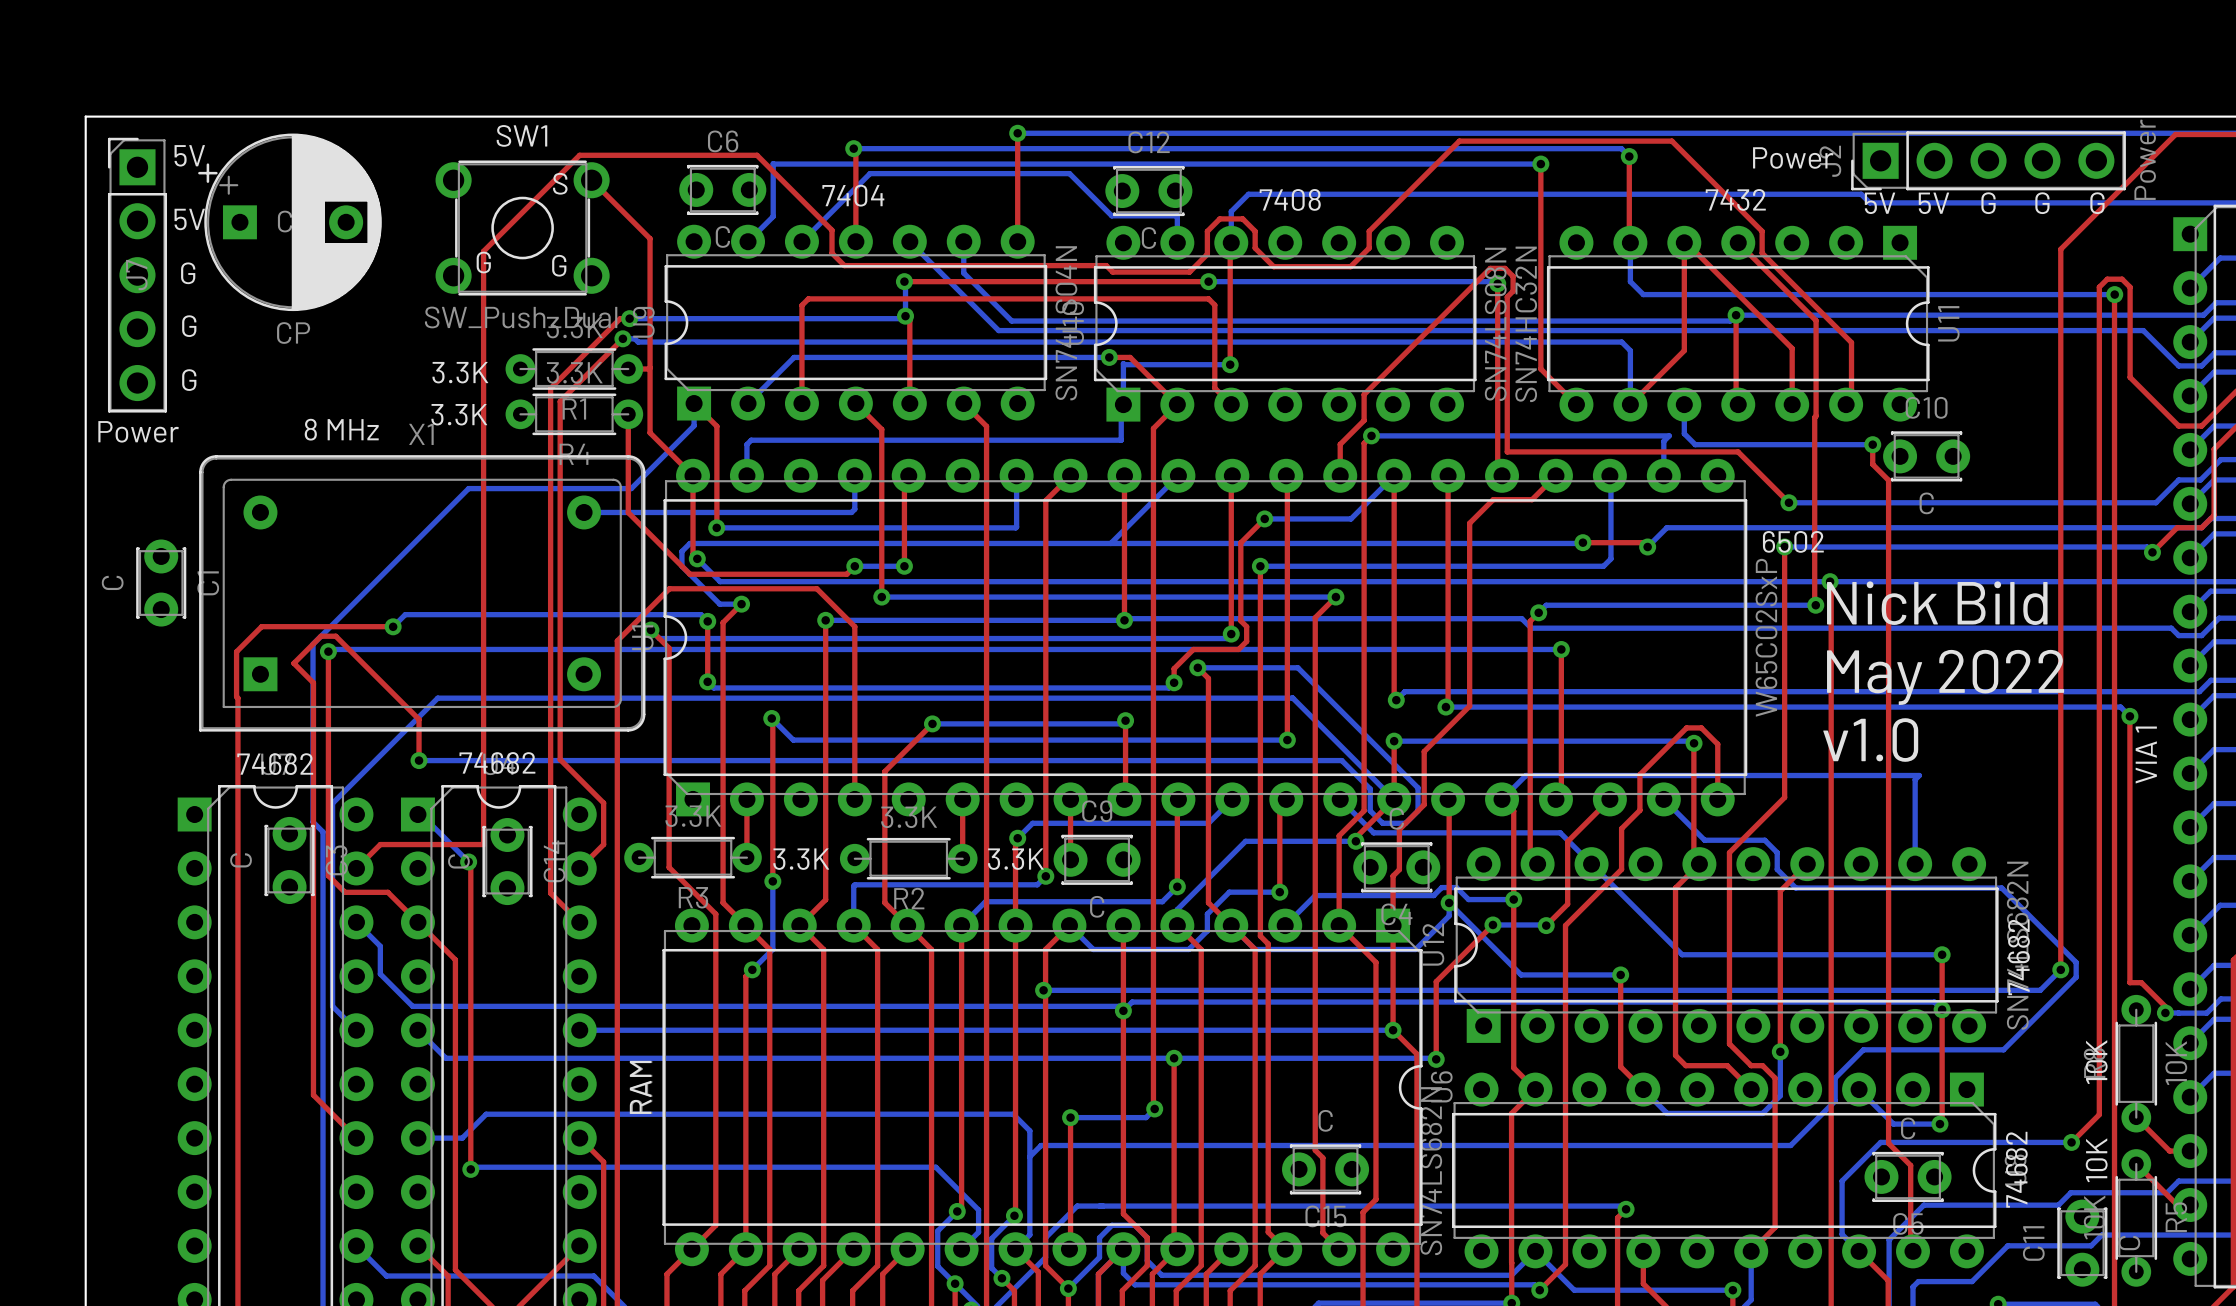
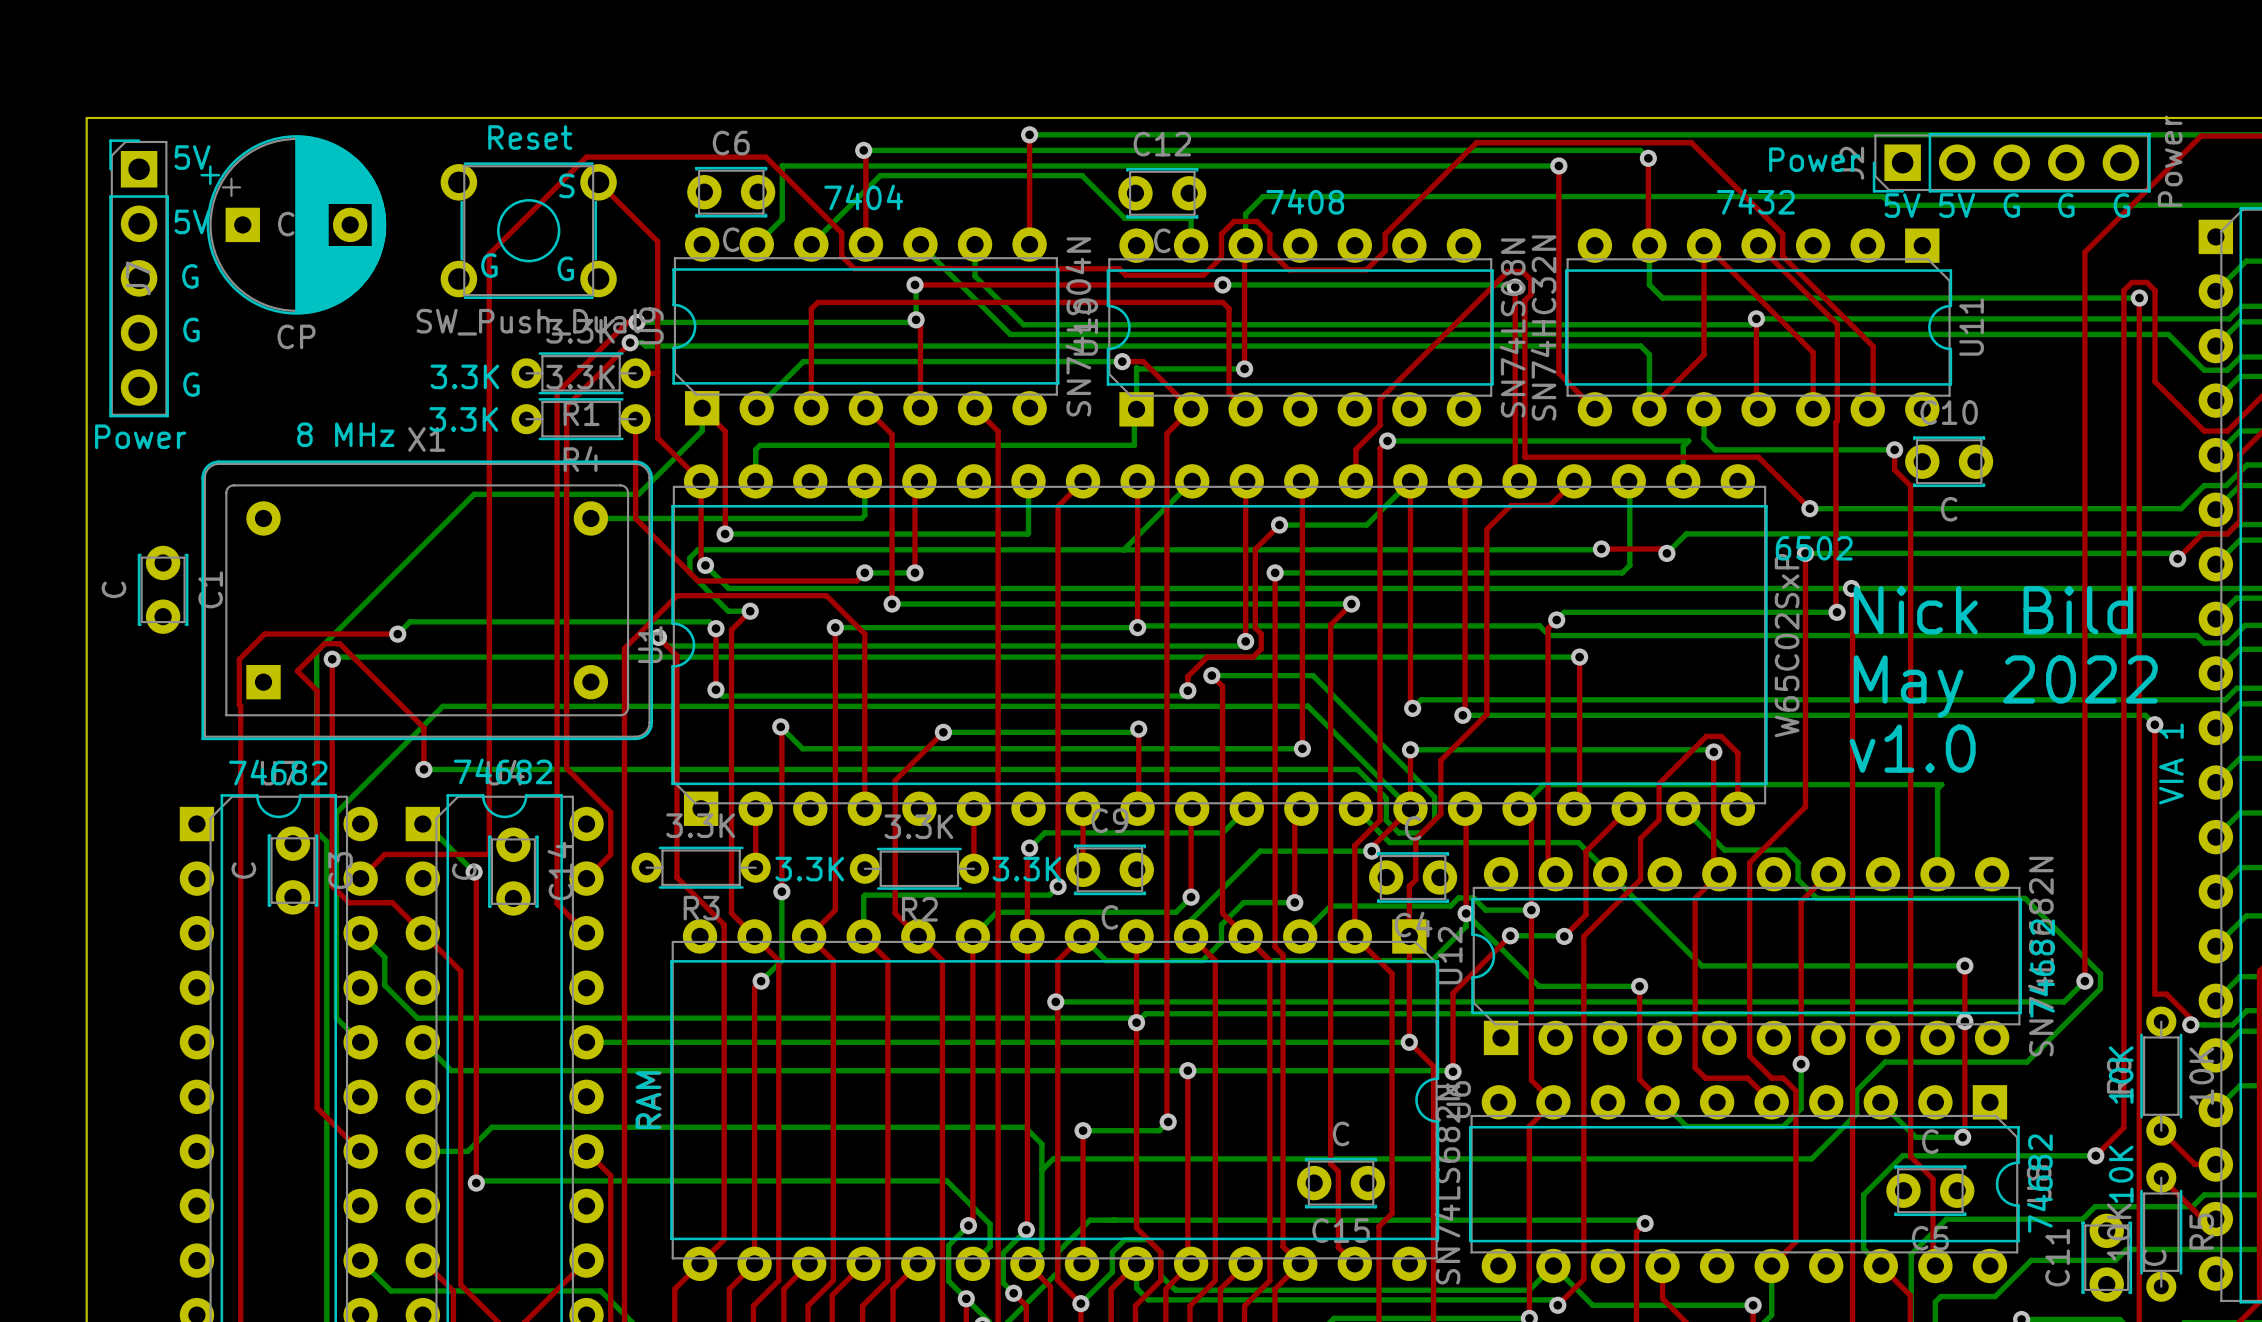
SW1 name: SW1 (521, 135) -> Reset (530, 137)

